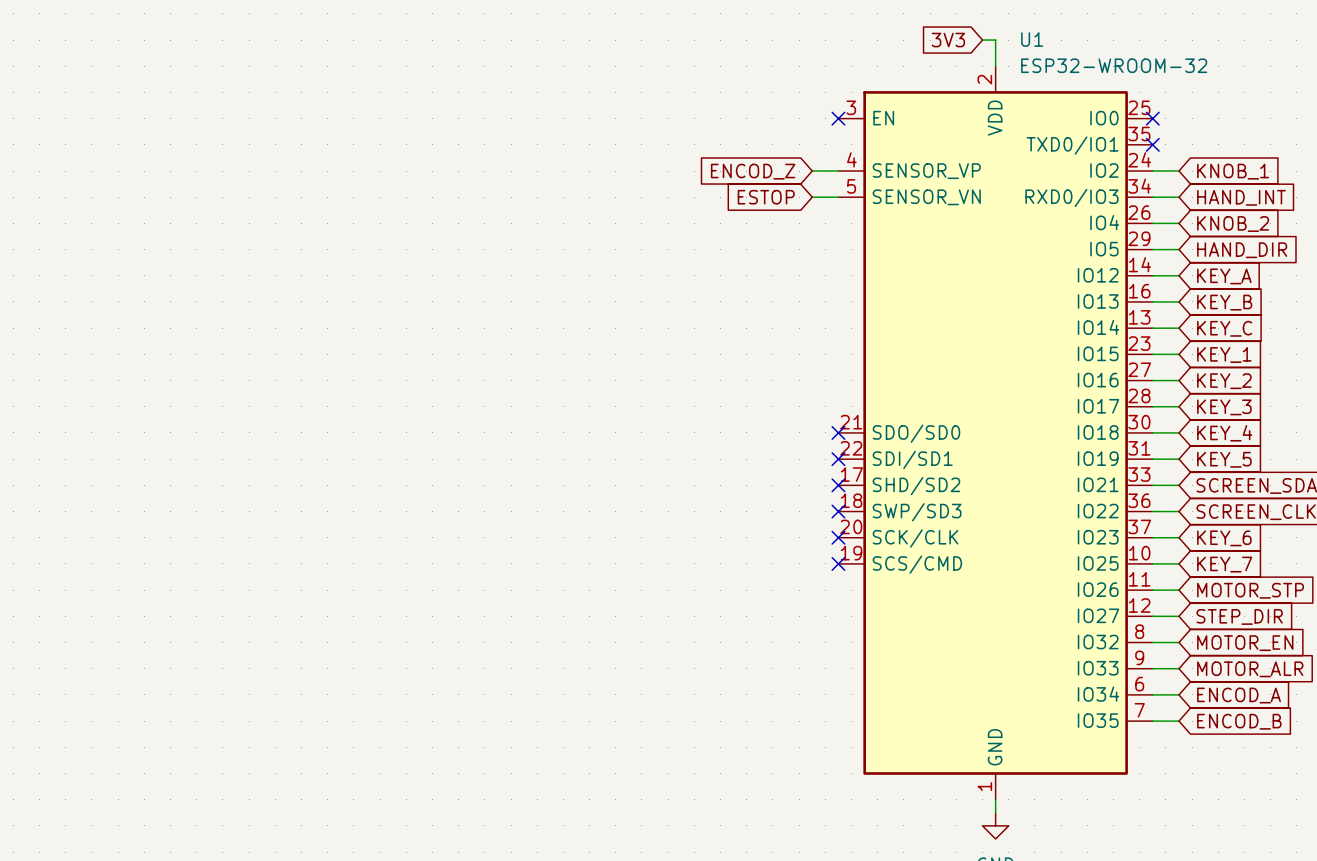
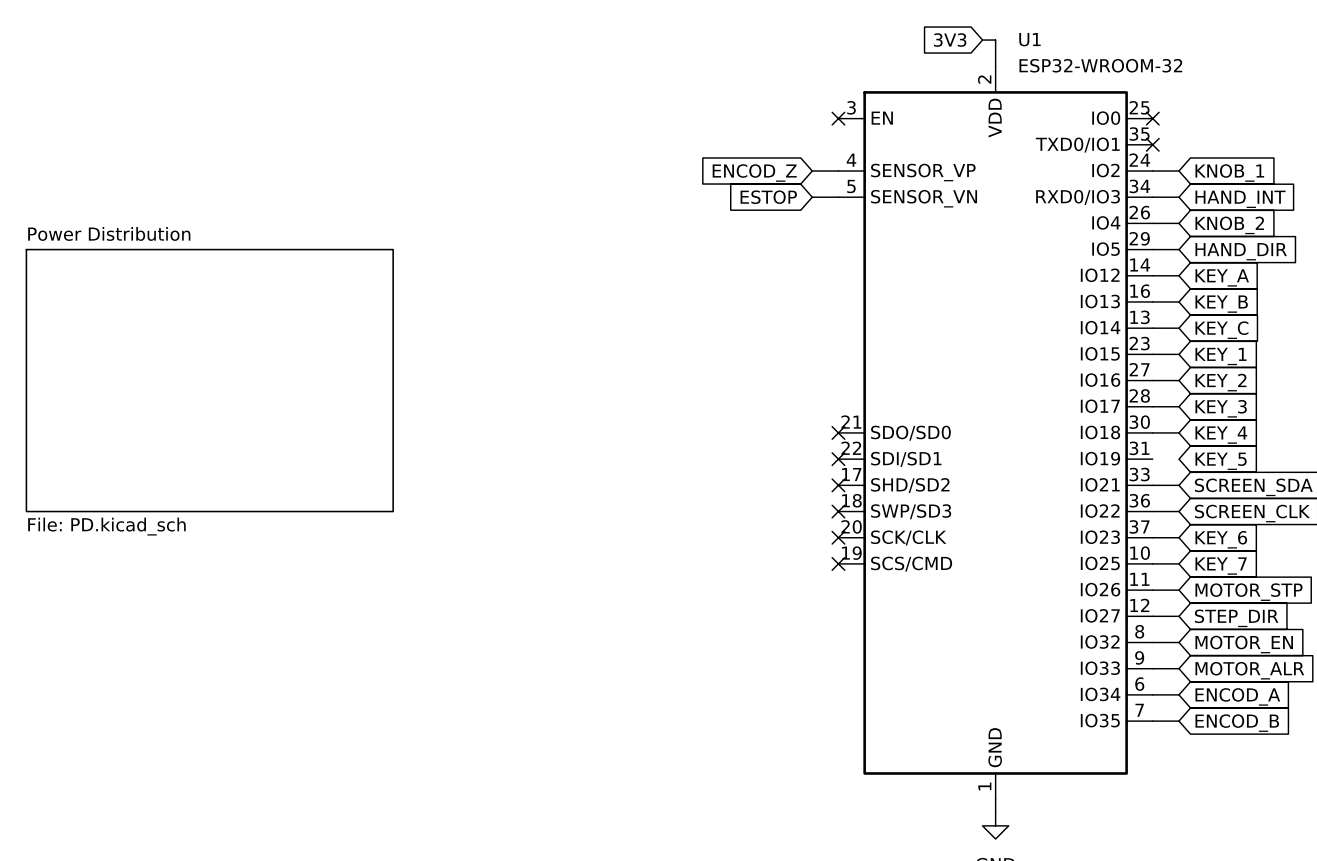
sheet Power Distribution: none -> File: PD.kicad_sch (209, 380)
wire: (1152, 459) (1178, 459) -> none

